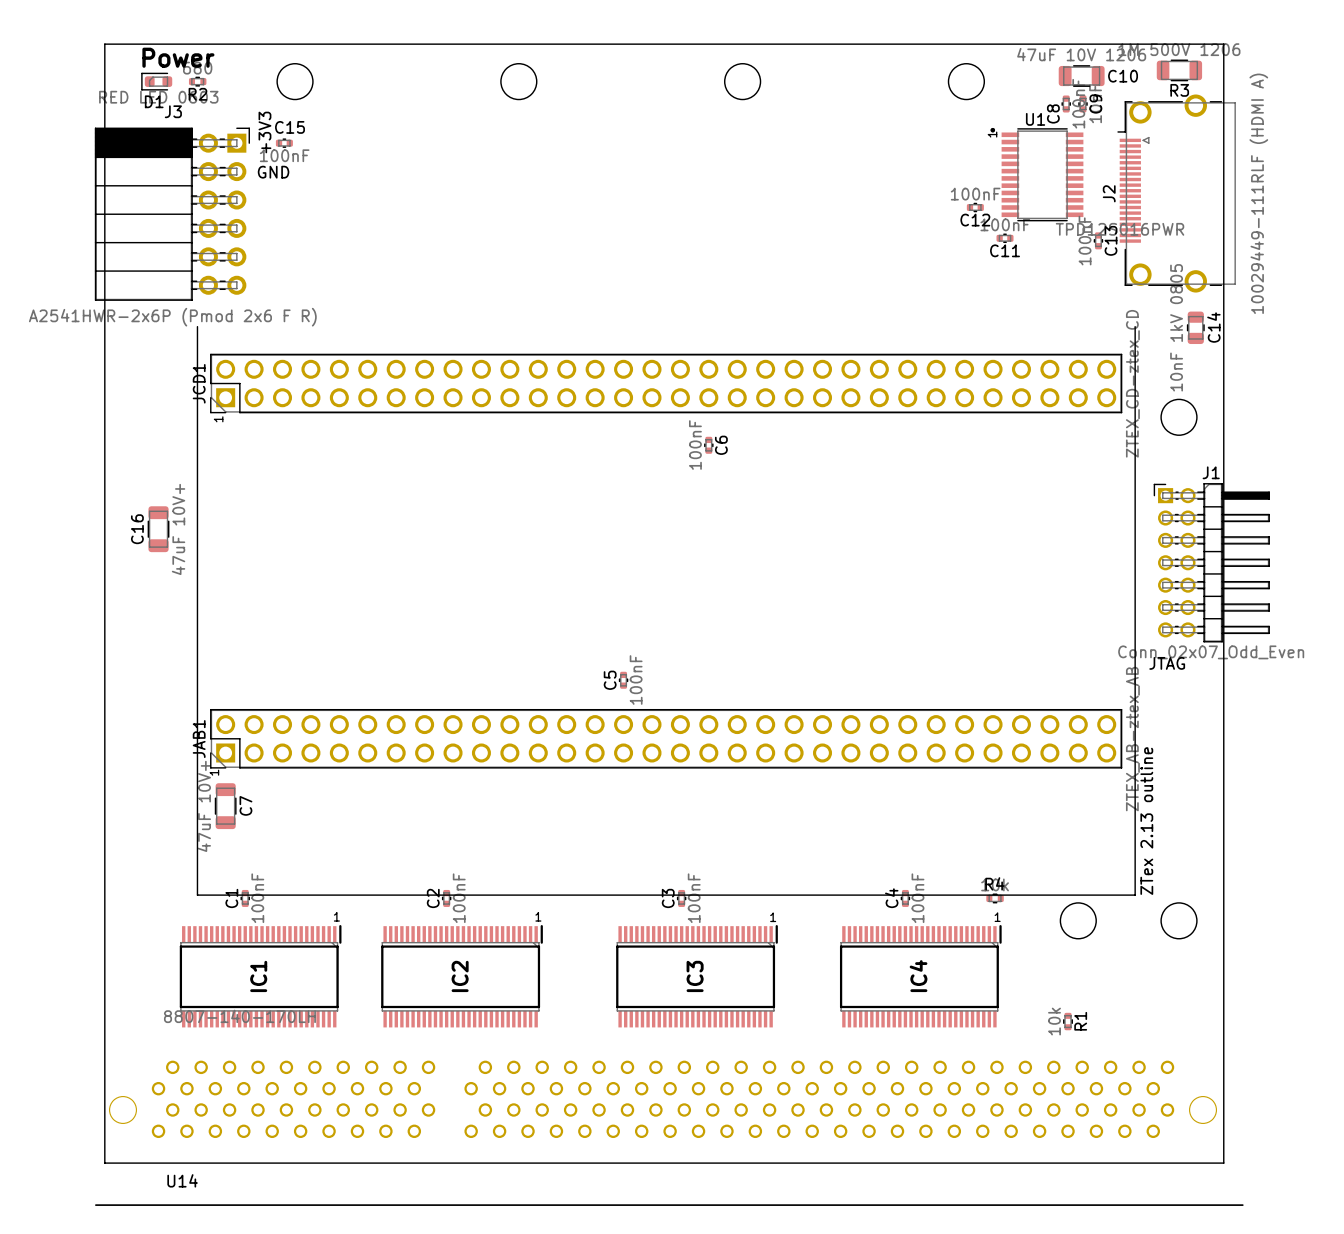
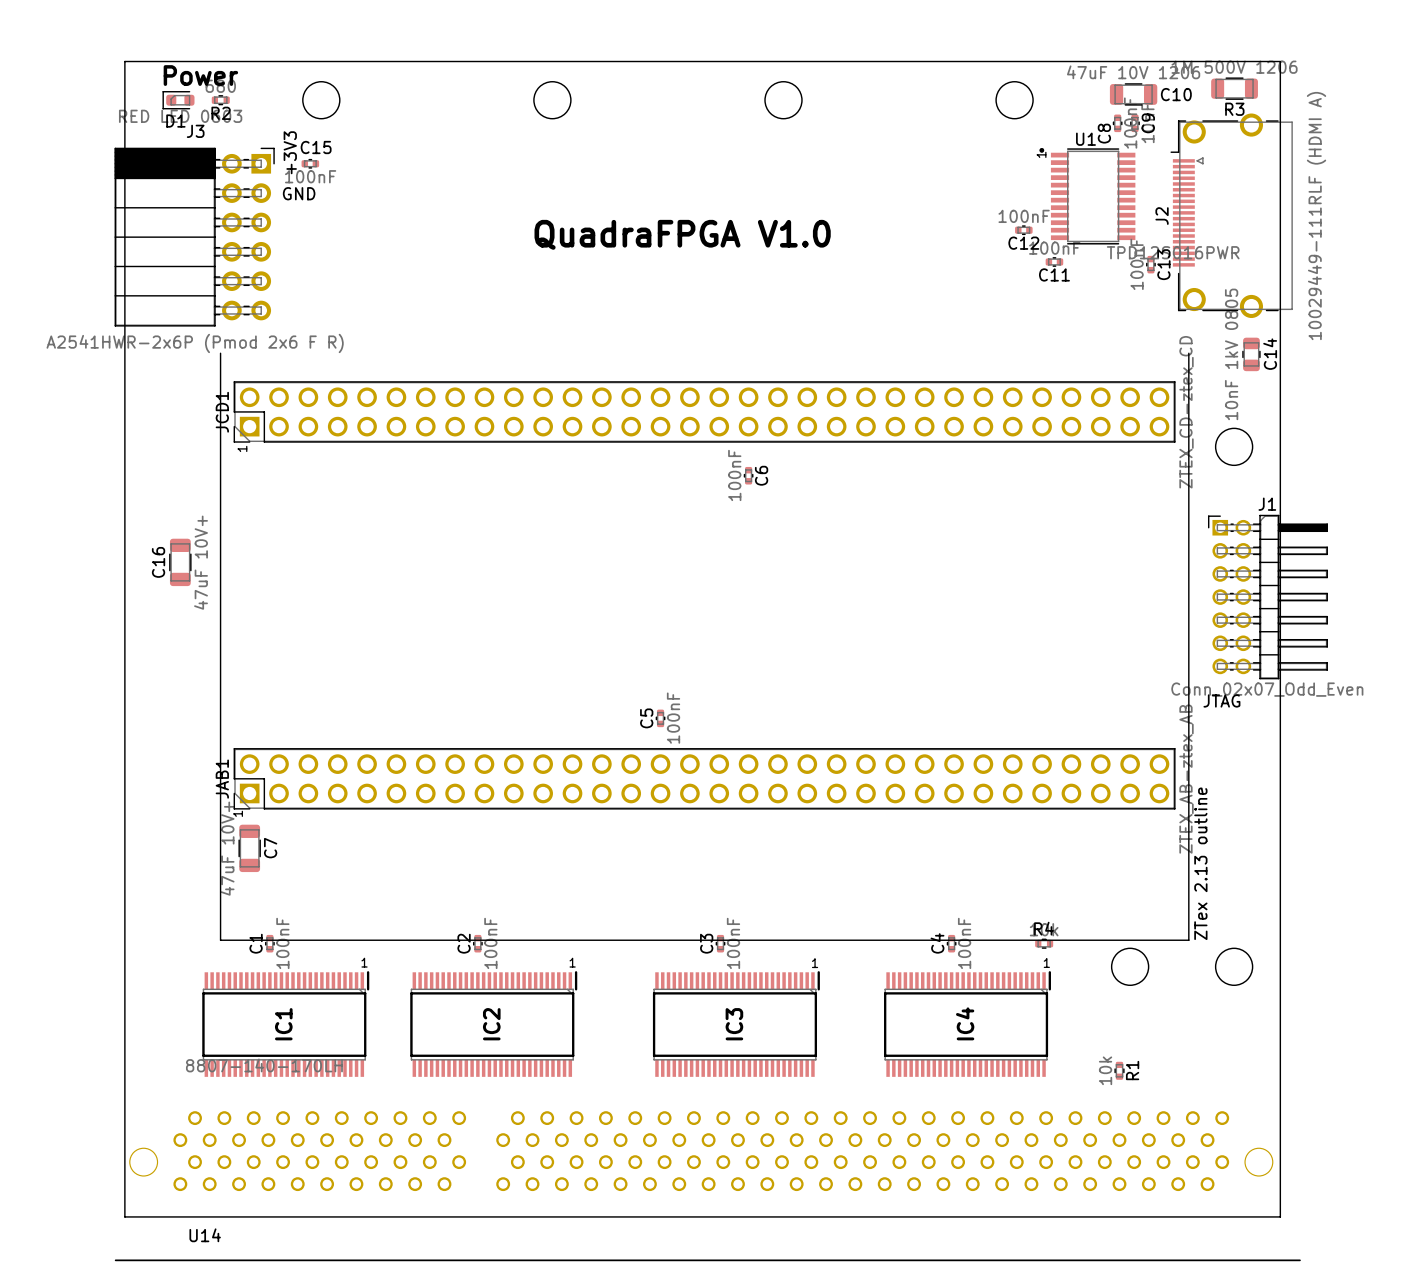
text: none -> QuadraFPGA V1.0 (682, 234)

